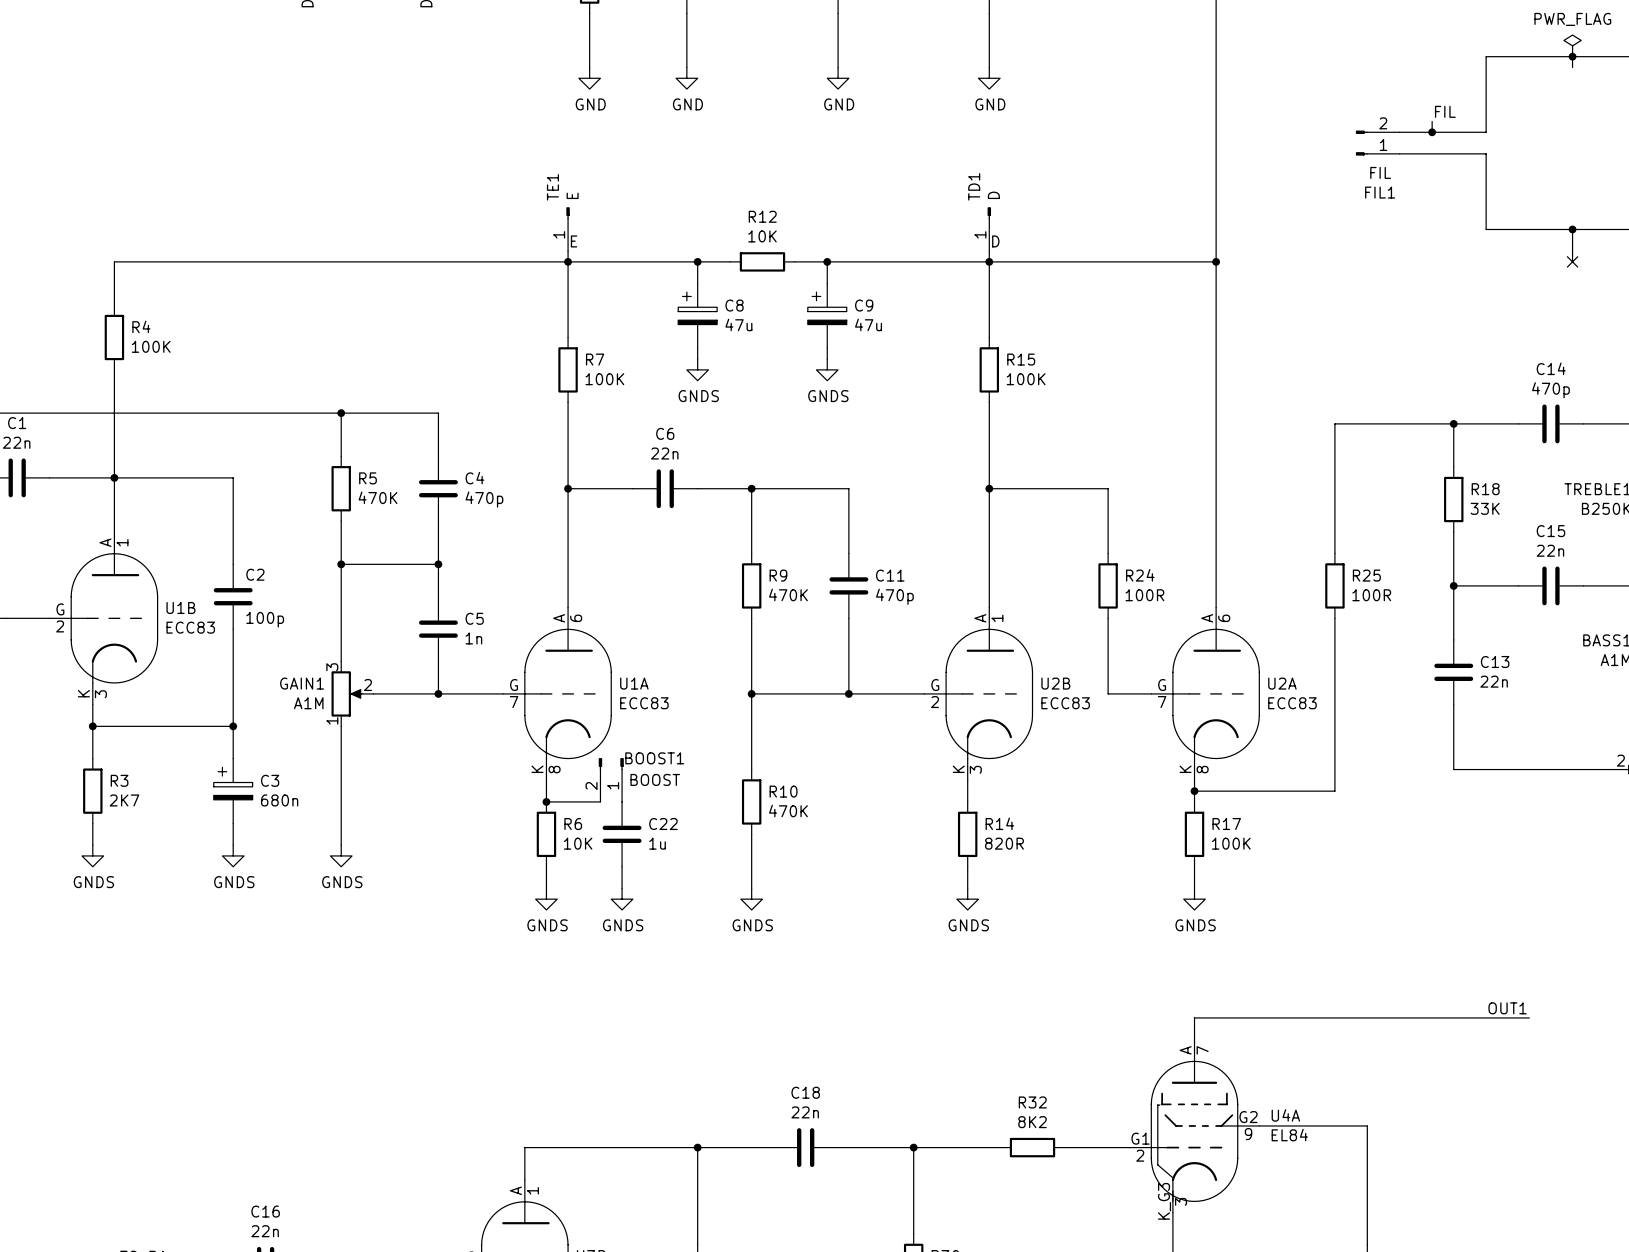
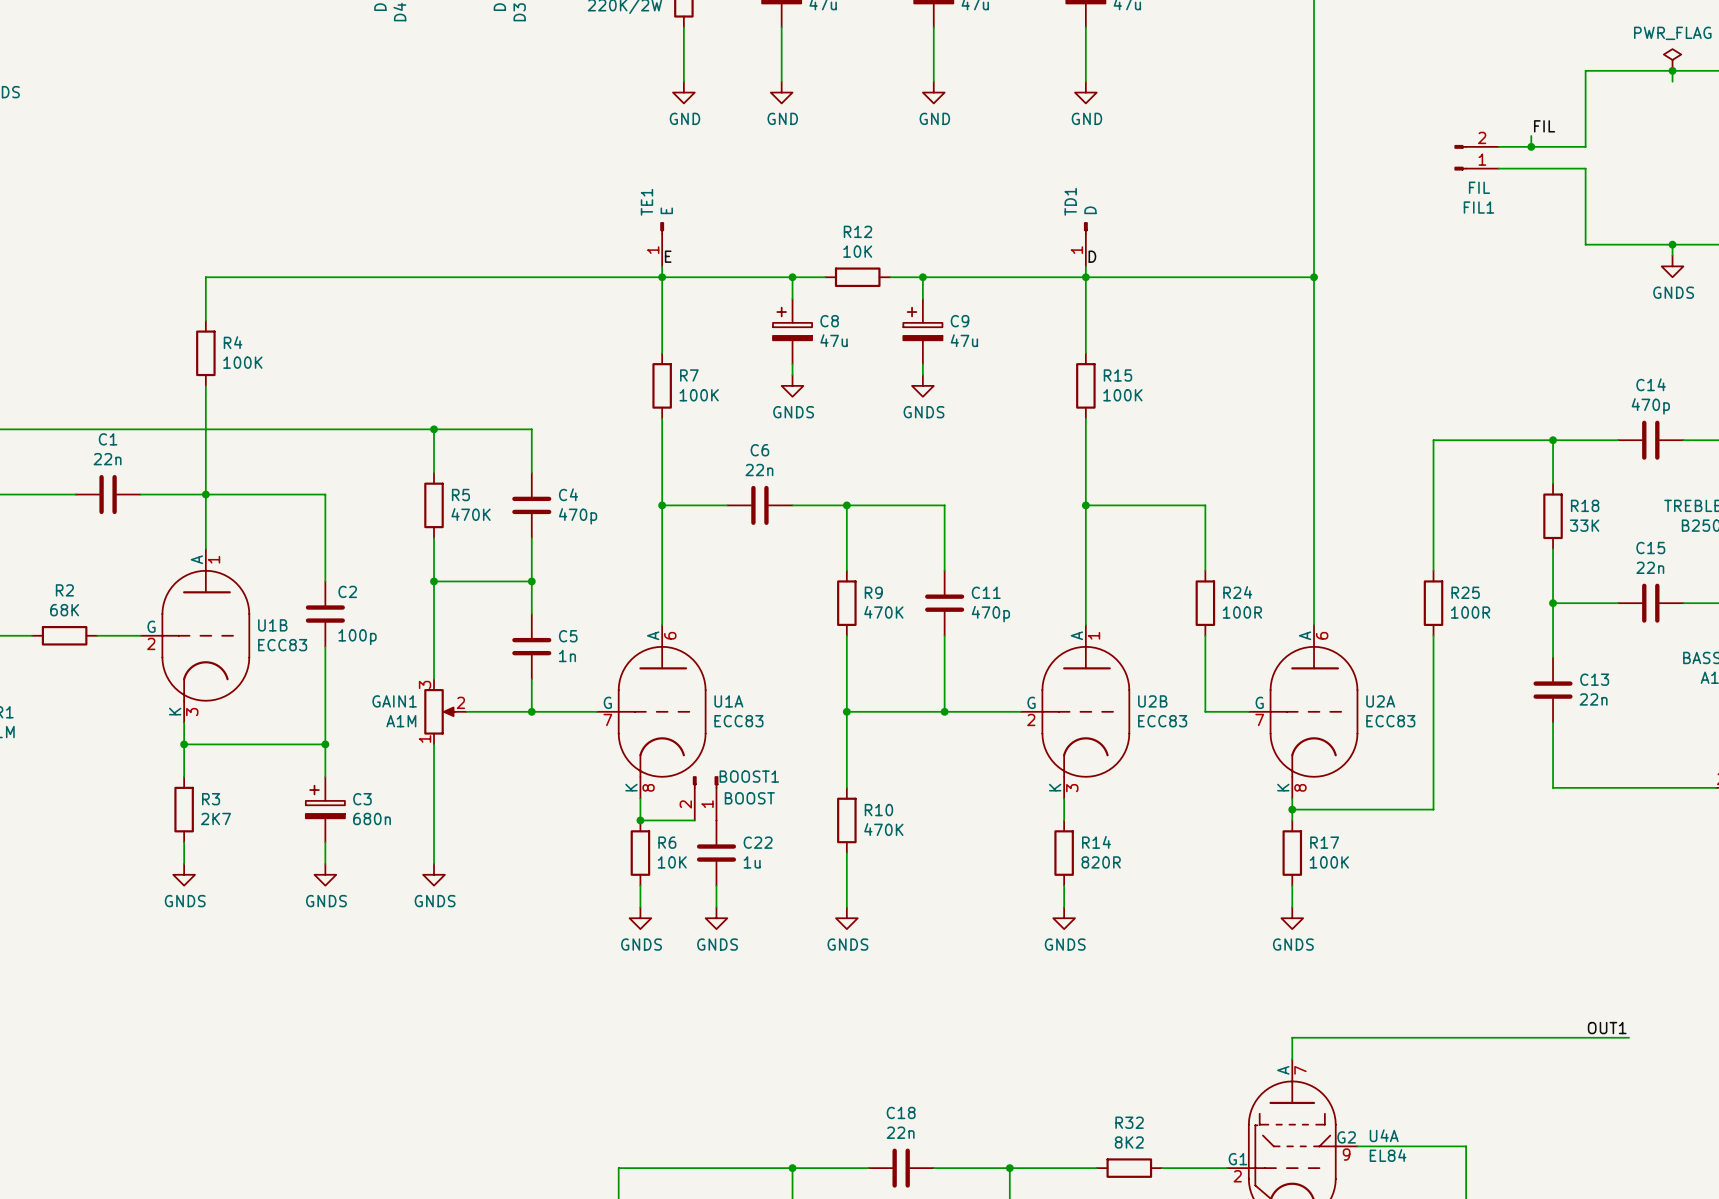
power symbol: none -> GNDS (1672, 266)
no-connect mark: (1572, 261) -> none

